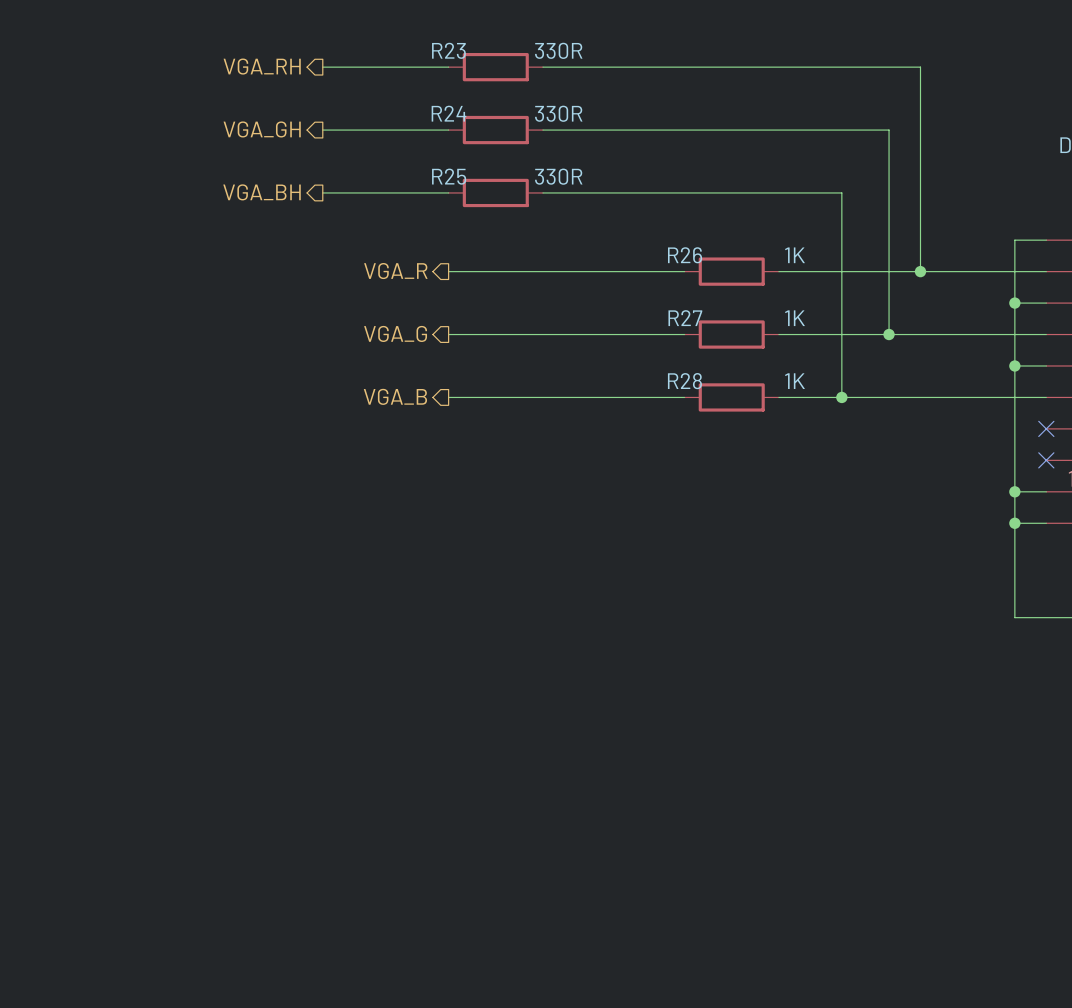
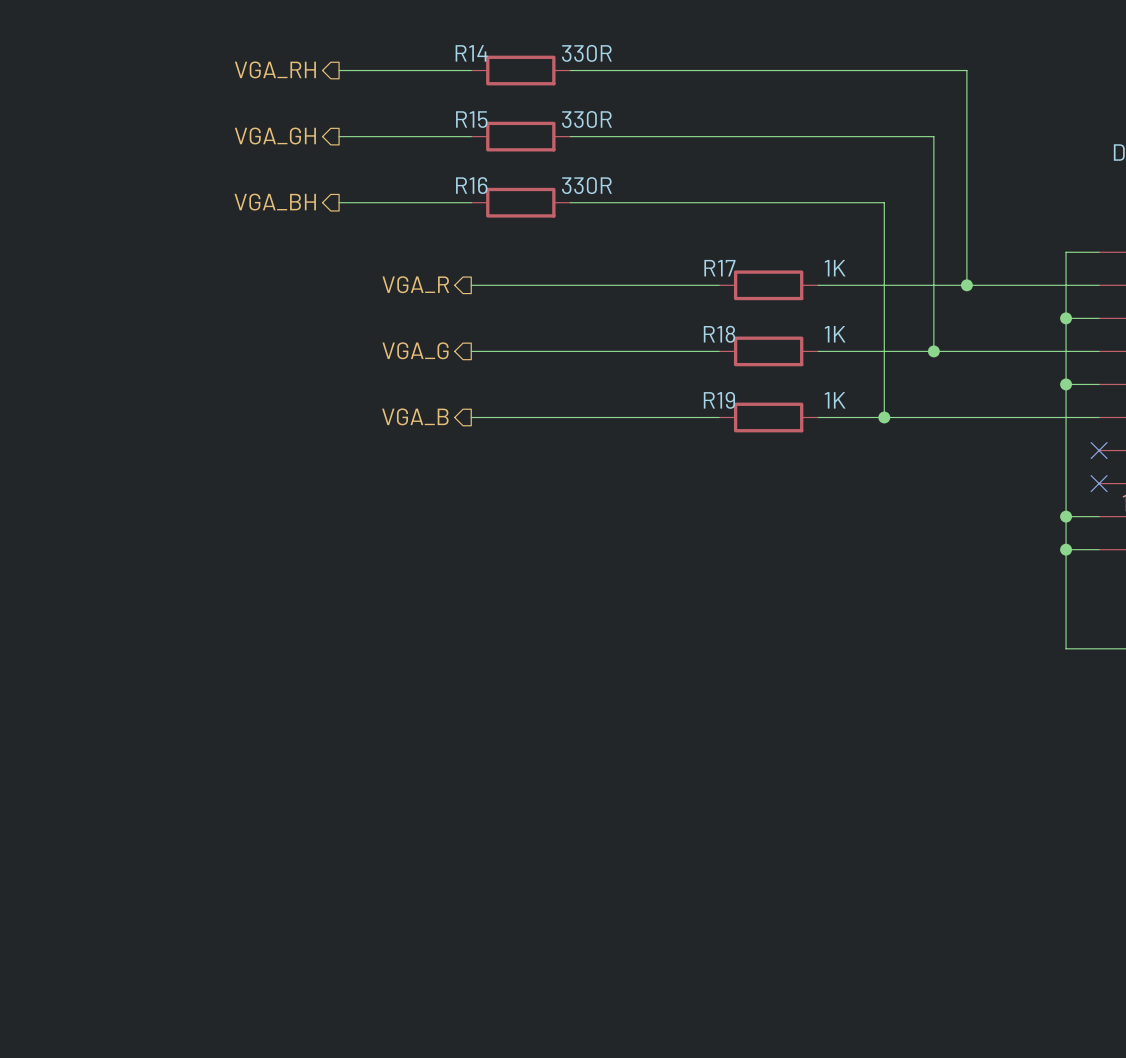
R23 name: R23 (448, 50) -> R14 (471, 53)
R24 name: R24 (448, 113) -> R15 (471, 119)
R25 name: R25 (449, 176) -> R16 (471, 185)
R26 name: R26 (685, 255) -> R17 (719, 268)
R27 name: R27 (685, 318) -> R18 (719, 334)
R28 name: R28 (684, 381) -> R19 (719, 400)

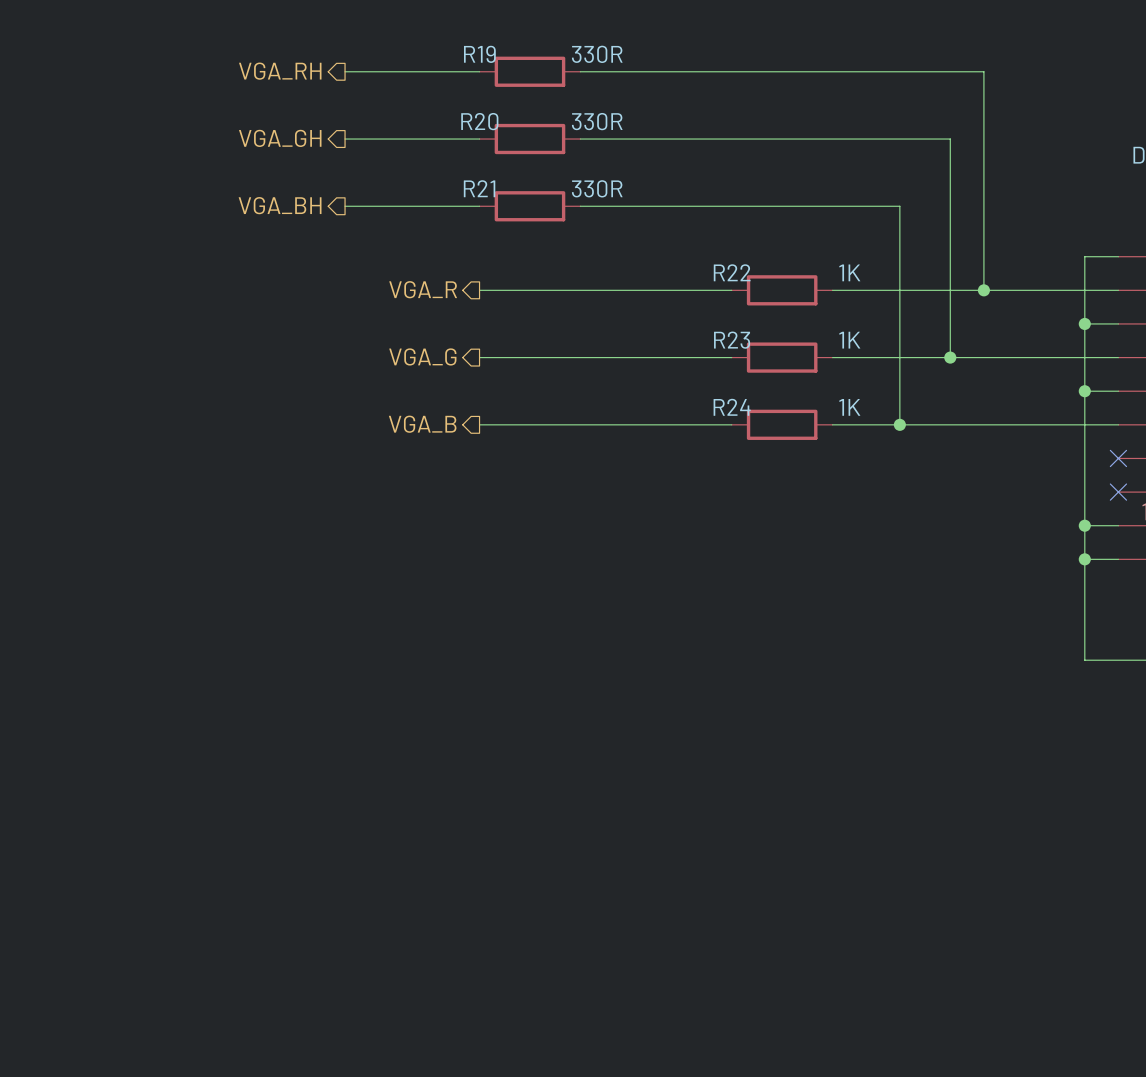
R14 name: R14 (471, 53) -> R19 (479, 54)
R15 name: R15 (471, 119) -> R20 (479, 121)
R16 name: R16 (471, 185) -> R21 (479, 188)
R17 name: R17 (719, 268) -> R22 (732, 272)
R18 name: R18 (719, 334) -> R23 (732, 340)
R19 name: R19 (719, 400) -> R24 (732, 407)

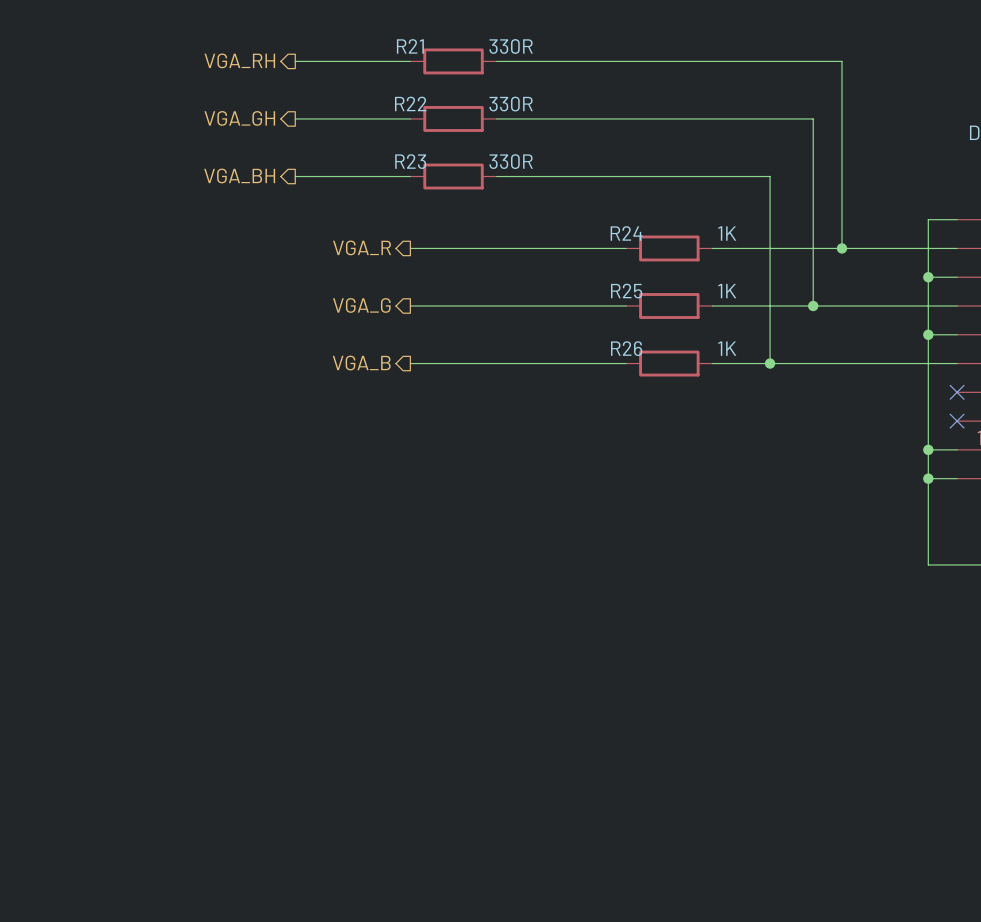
R19 name: R19 (479, 54) -> R21 (410, 46)
R20 name: R20 (479, 121) -> R22 (410, 103)
R21 name: R21 (479, 188) -> R23 (410, 161)
R22 name: R22 (732, 272) -> R24 (626, 233)
R23 name: R23 (732, 340) -> R25 (626, 291)
R24 name: R24 (732, 407) -> R26 (626, 348)

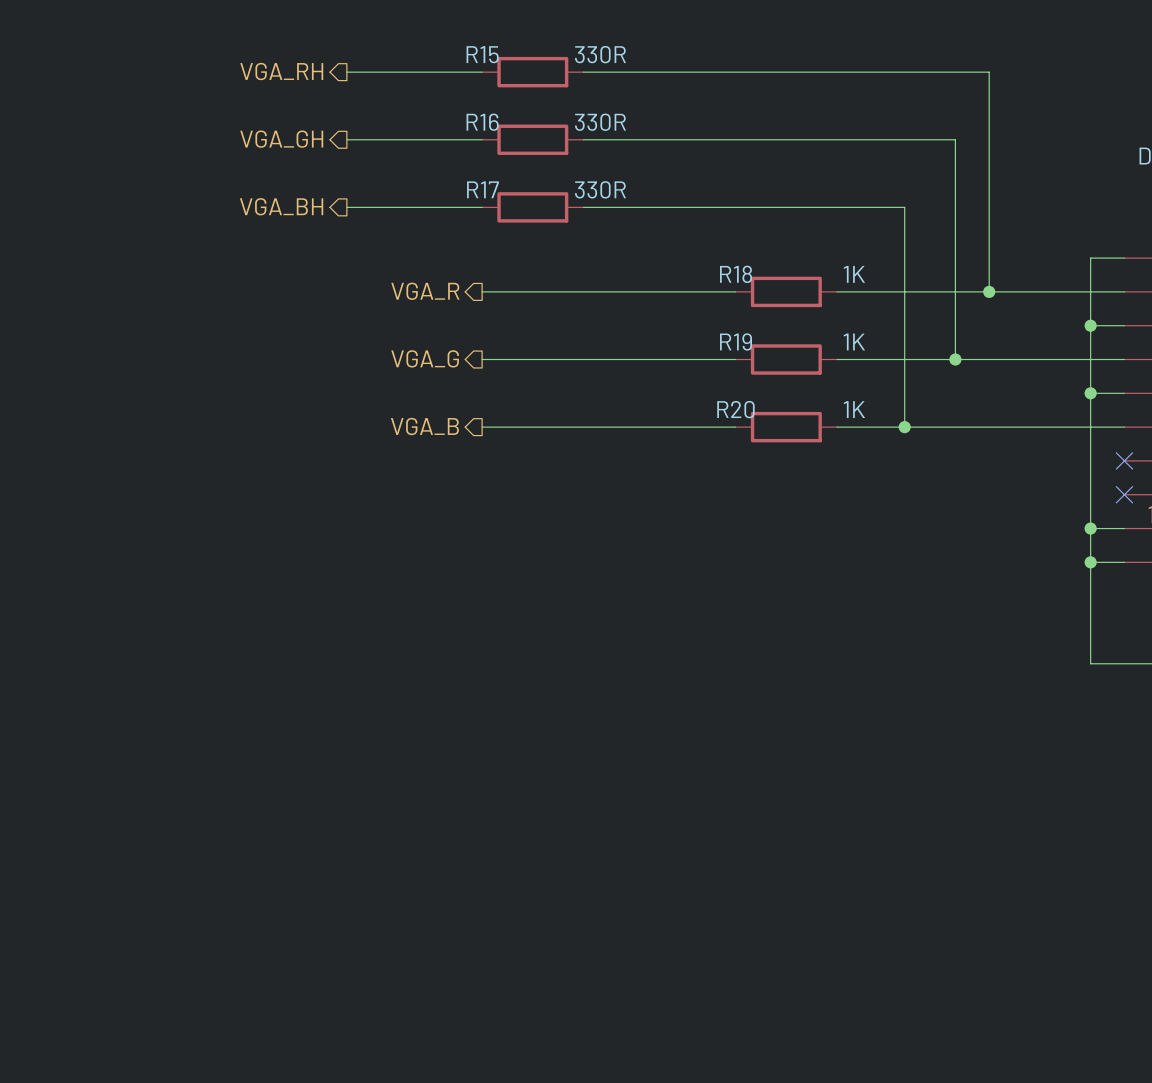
R21 name: R21 (410, 46) -> R15 (482, 54)
R22 name: R22 (410, 103) -> R16 (482, 122)
R23 name: R23 (410, 161) -> R17 (482, 189)
R24 name: R24 (626, 233) -> R18 (736, 274)
R25 name: R25 (626, 291) -> R19 (736, 341)
R26 name: R26 (626, 348) -> R20 (735, 409)

